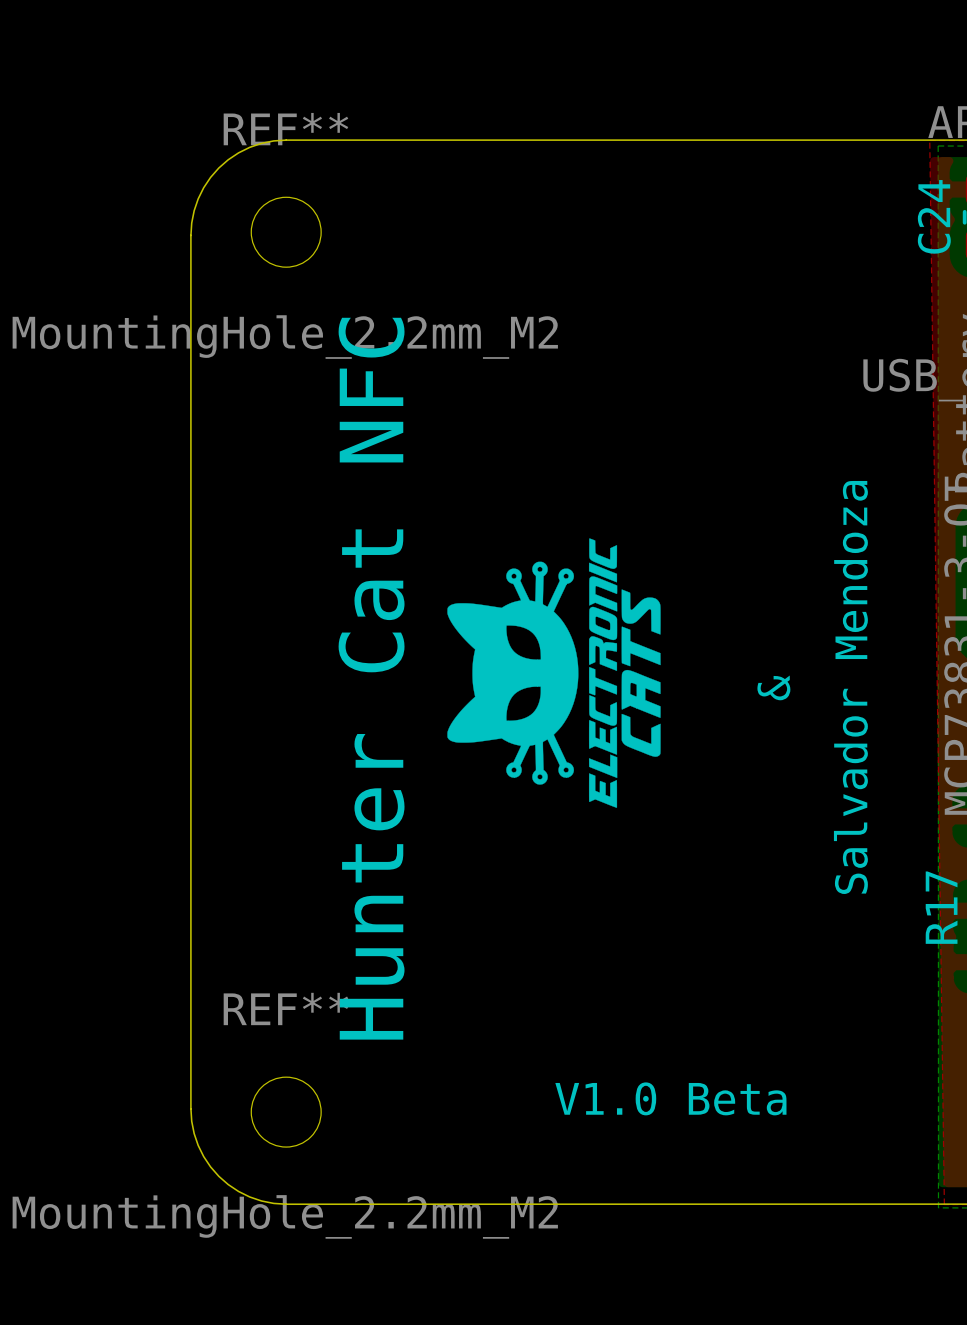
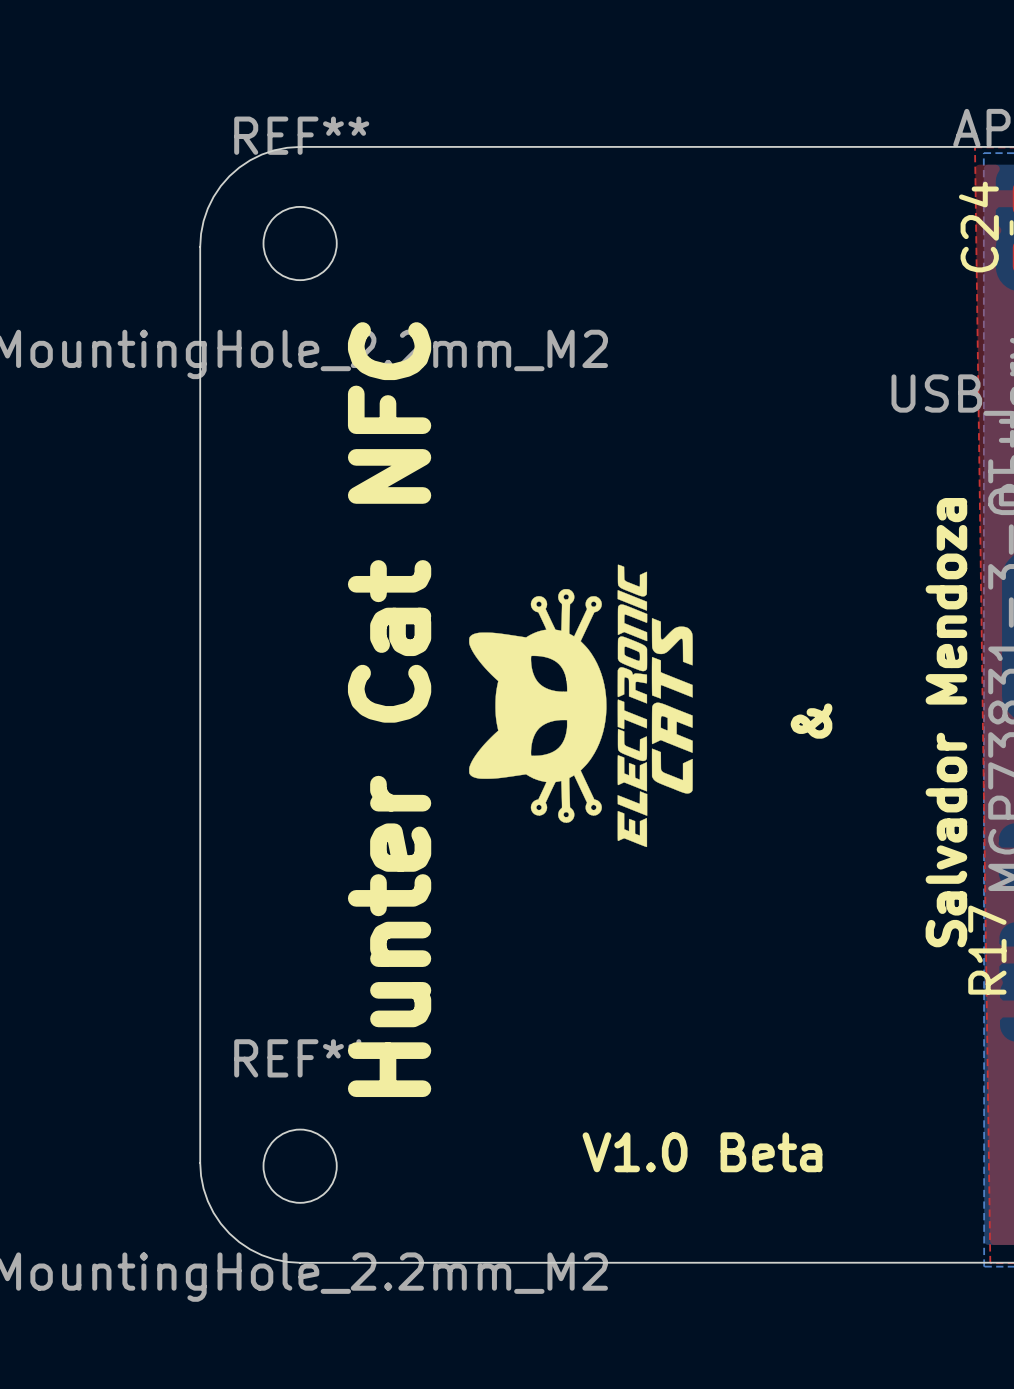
text position: Salvador Mendoza (850, 687) -> Salvador Mendoza (946, 722)

